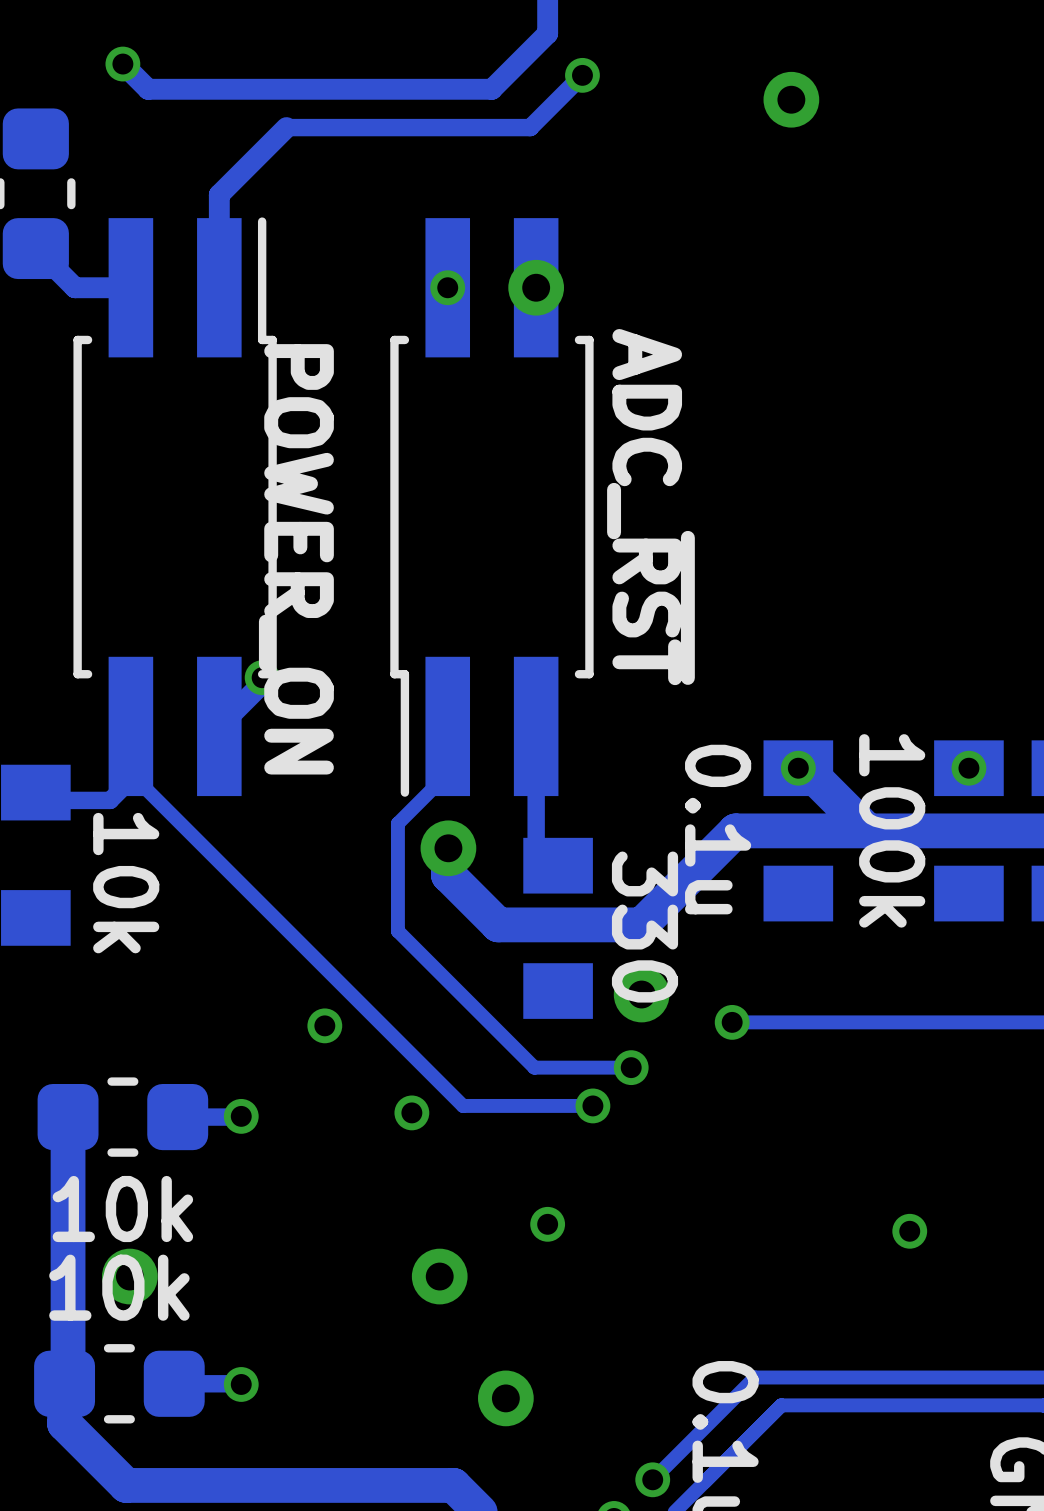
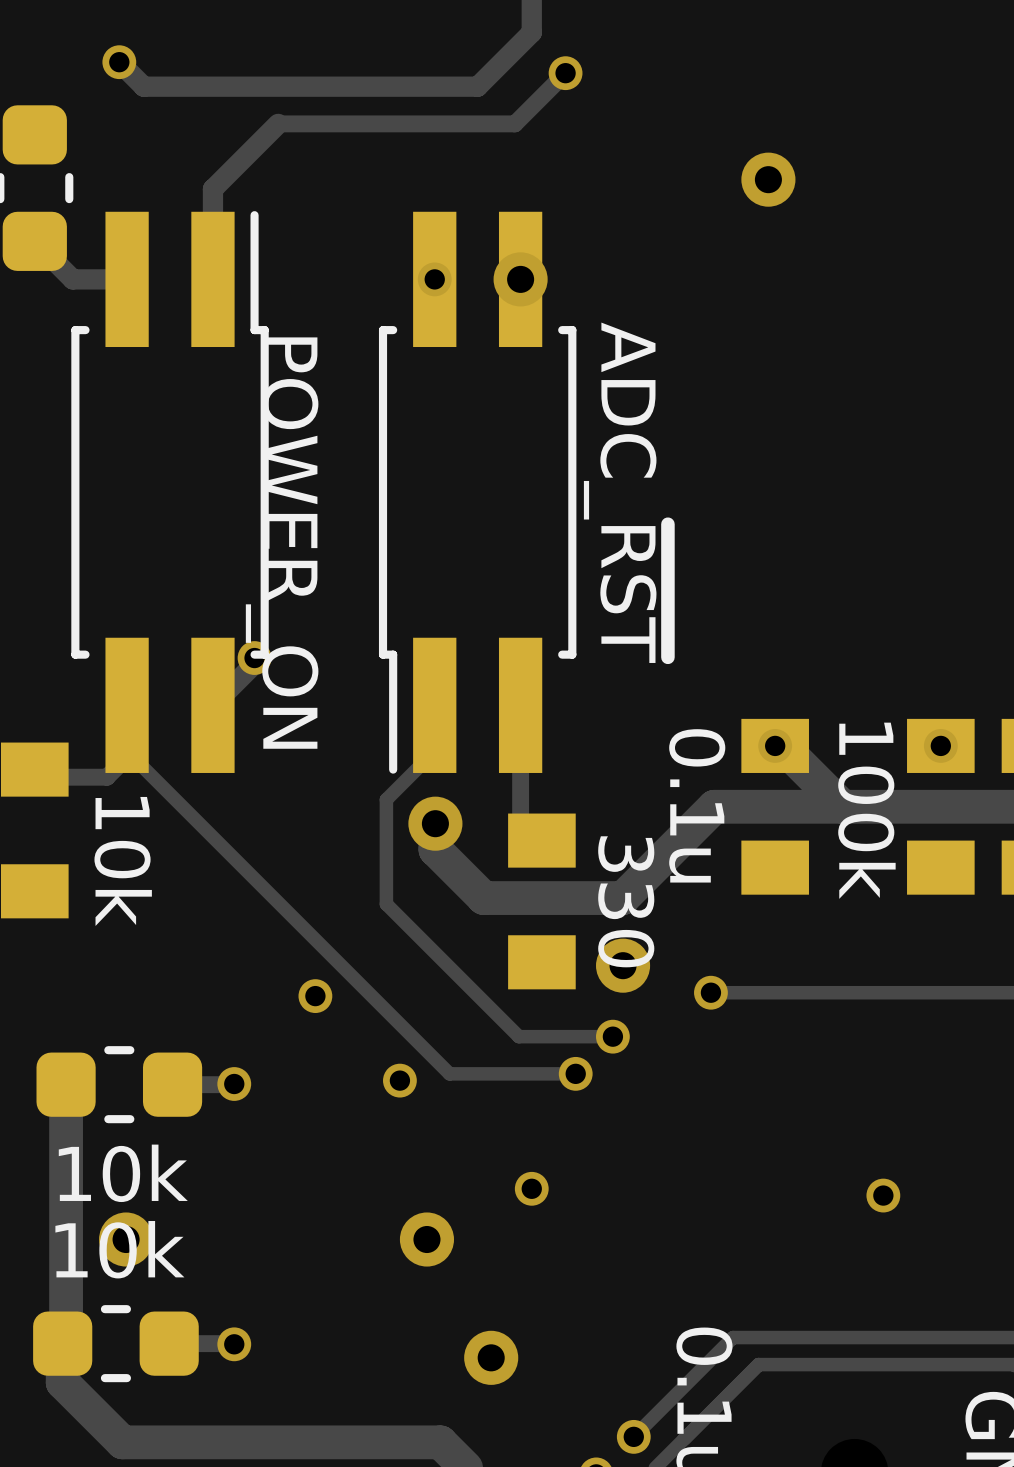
via position: (791, 99) -> (768, 179)

